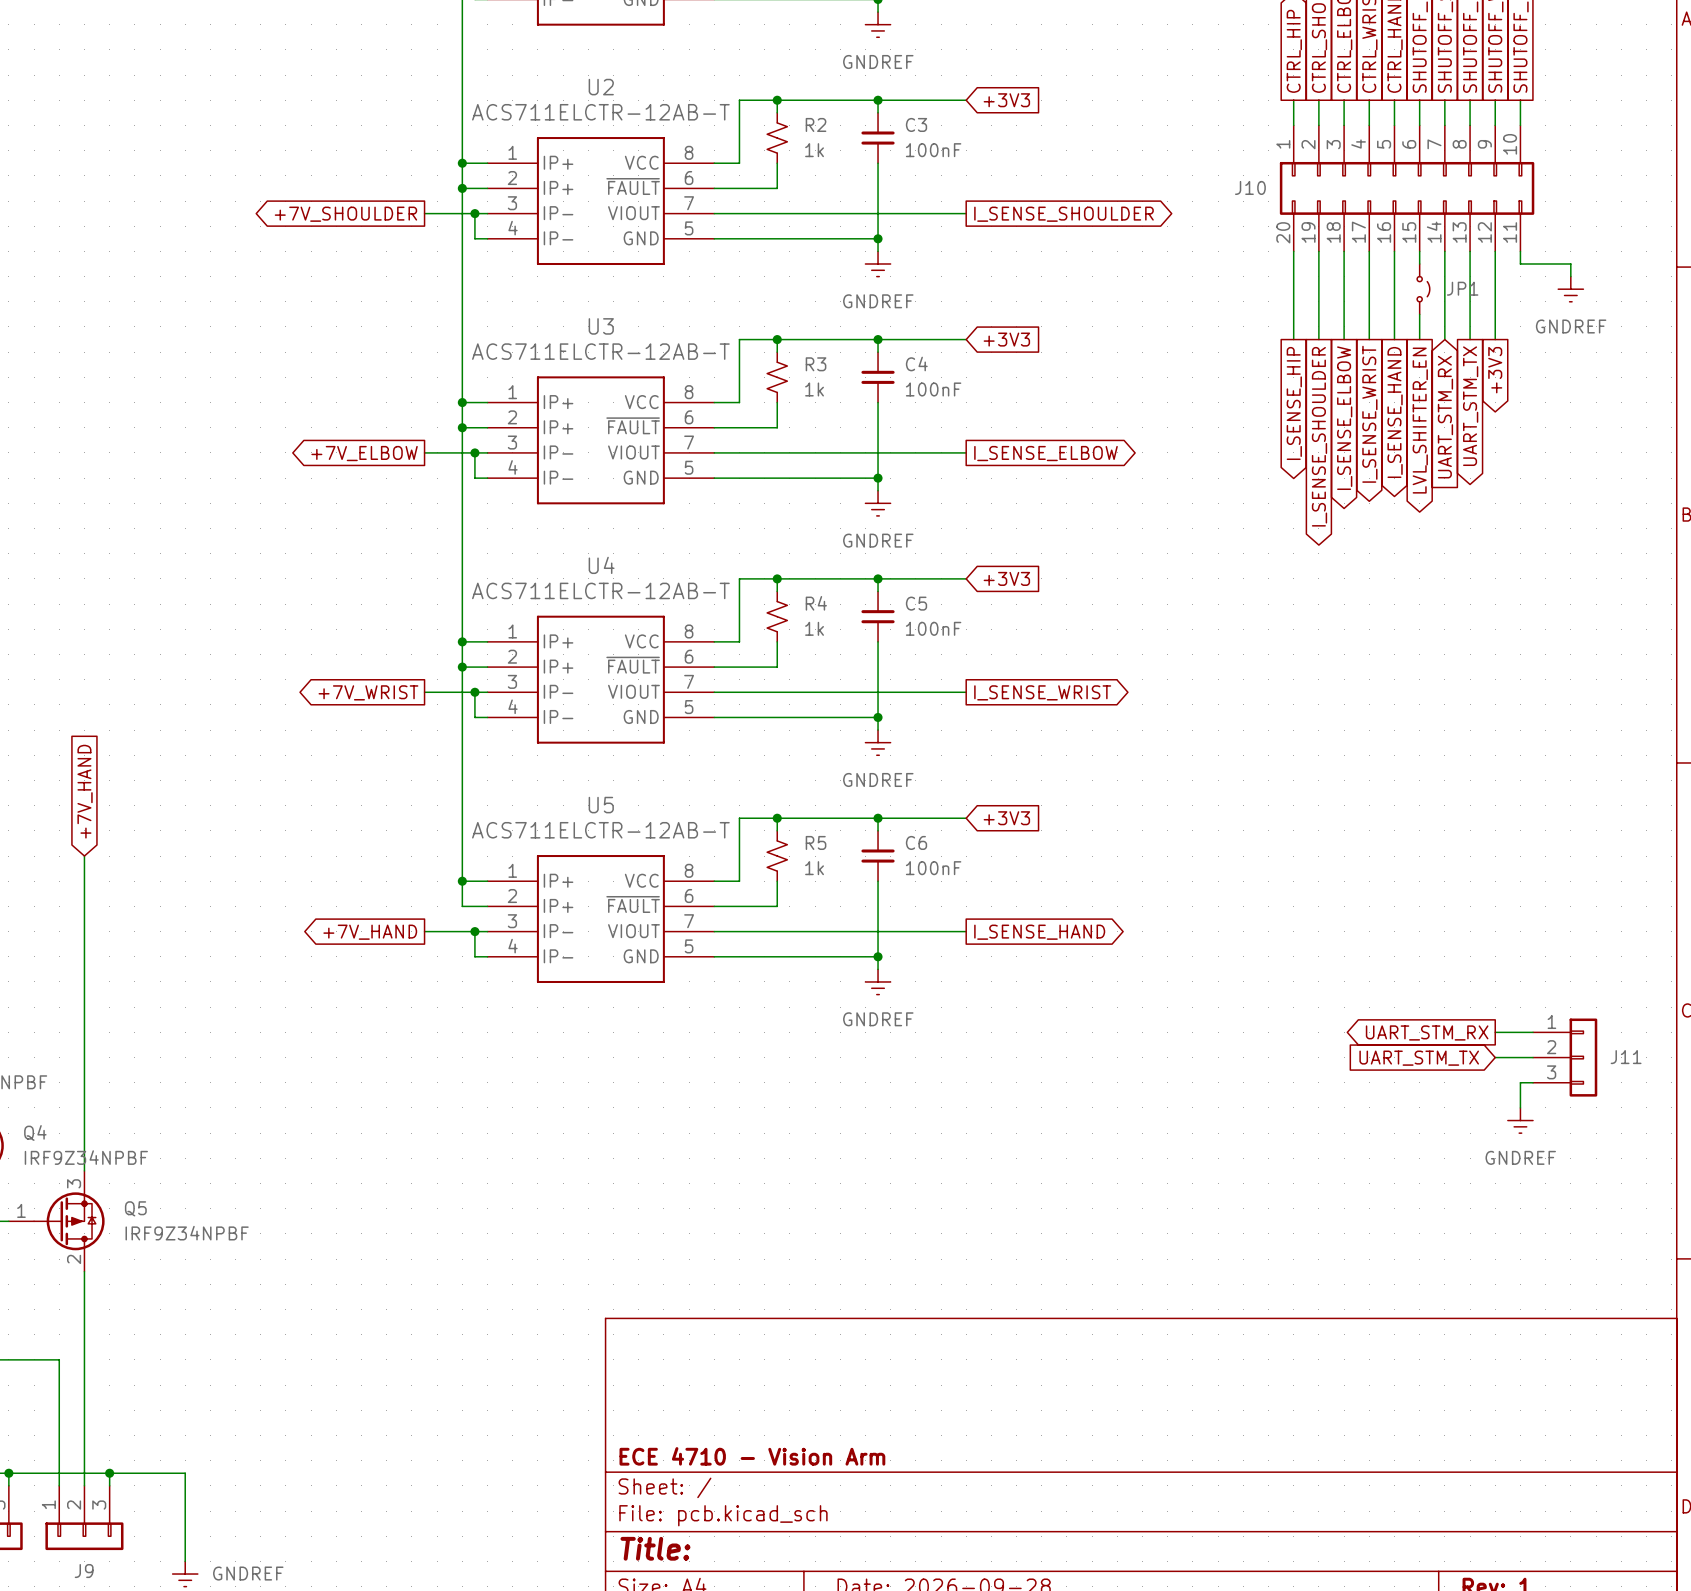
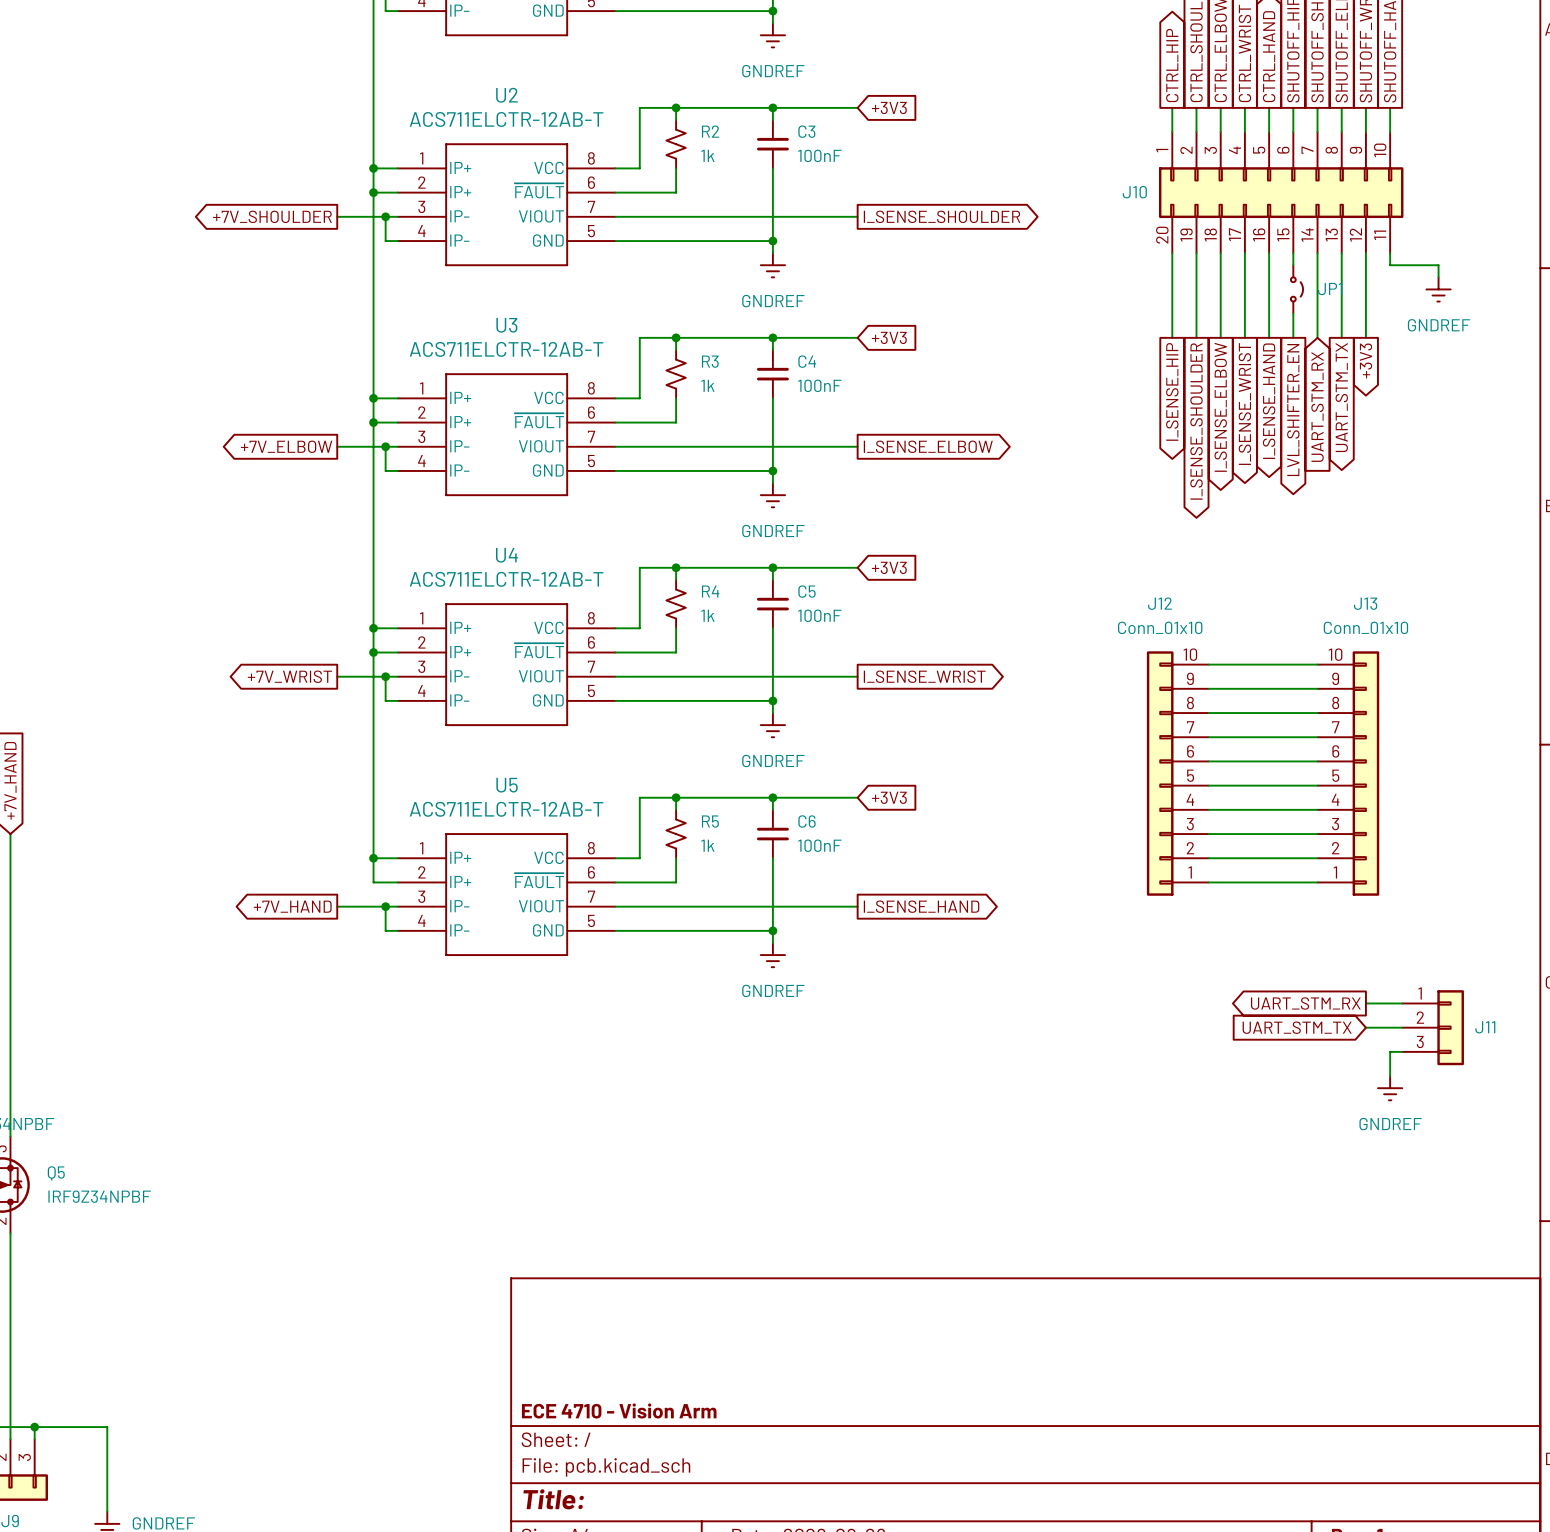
wire: none -> (1208, 664) (1317, 664)
wire: none -> (1208, 688) (1317, 688)
wire: none -> (1208, 713) (1317, 713)
wire: none -> (1208, 737) (1317, 737)
wire: none -> (1208, 761) (1317, 761)
J12: none -> Conn_01x10 (1177, 773)
J13: none -> Conn_01x10 (1348, 773)
wire: none -> (1208, 785) (1317, 785)
wire: none -> (1208, 809) (1317, 809)
wire: none -> (1208, 834) (1317, 834)
wire: none -> (1208, 858) (1317, 858)
wire: none -> (1208, 882) (1317, 882)

